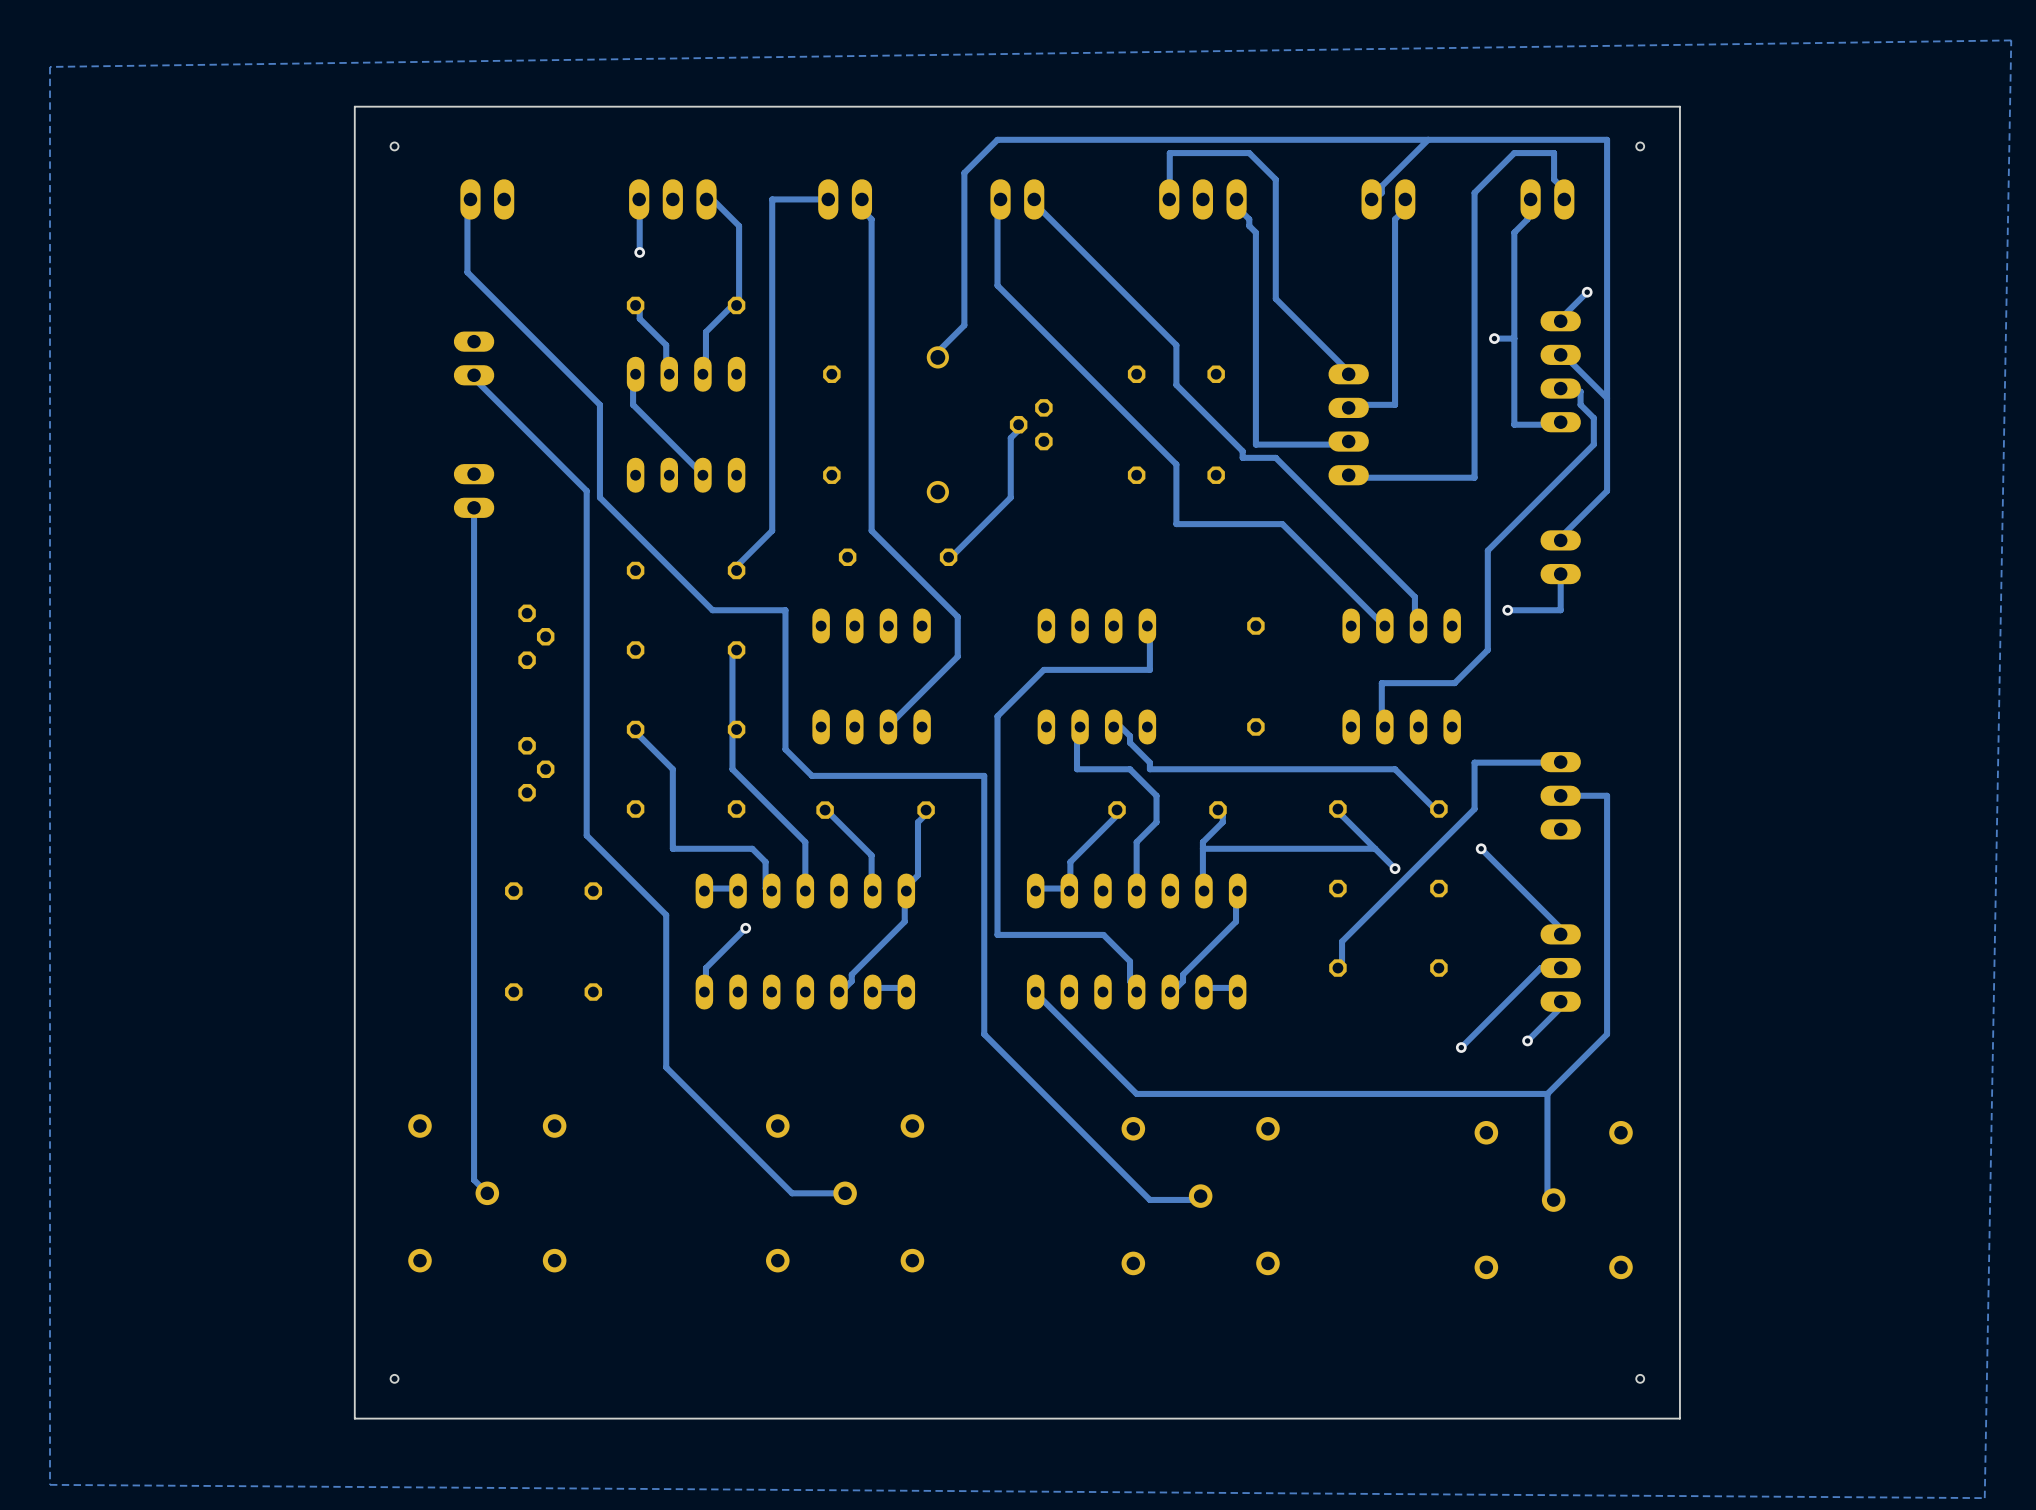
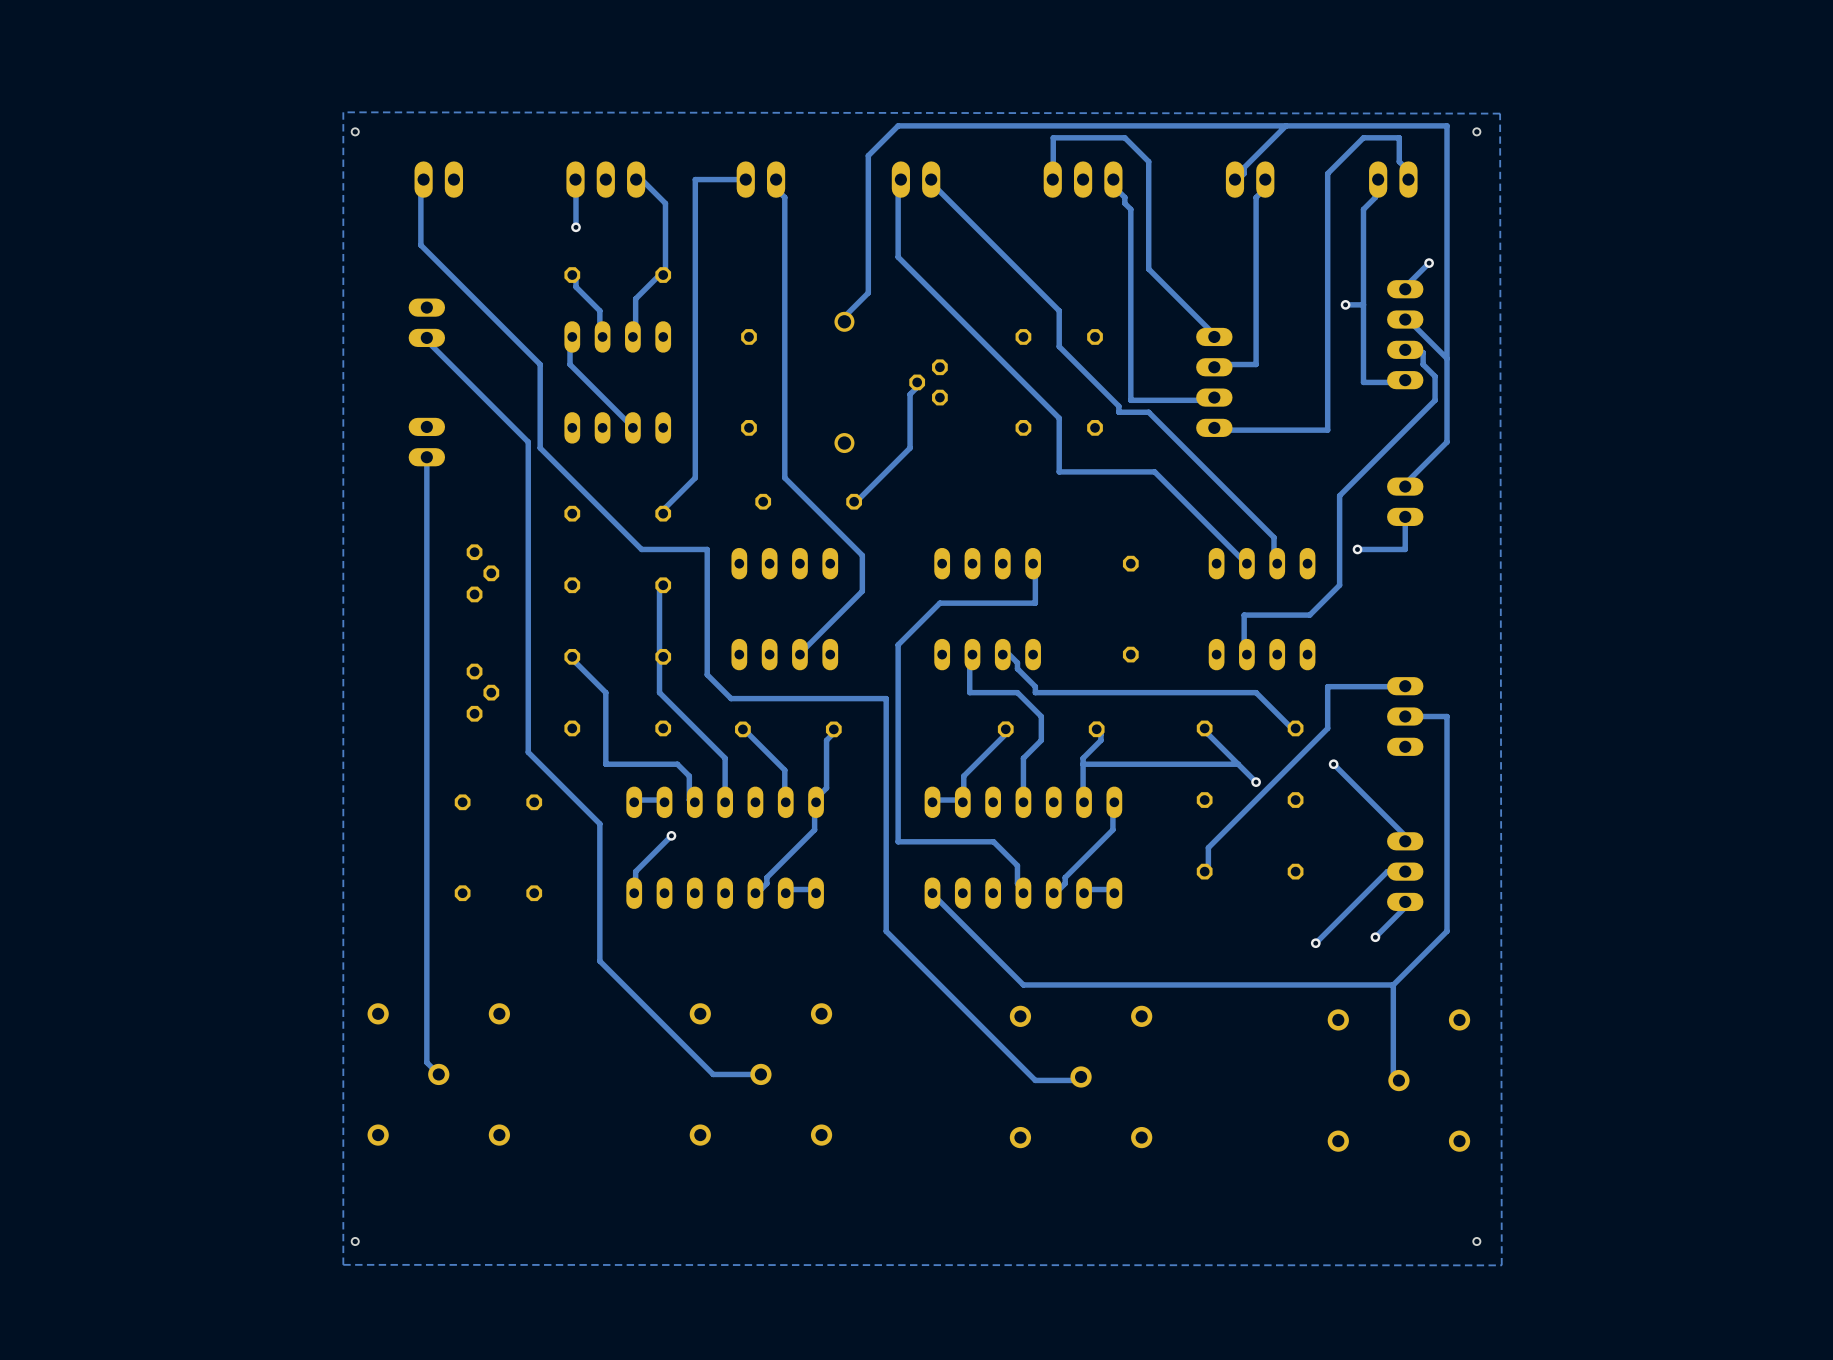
zone outline: (2011, 40) (50, 66) (50, 1484) (1984, 1498) (2011, 40) -> (343, 112) (1500, 113) (1501, 1265) (343, 1264) (343, 112)
board edge: (1679, 106) (354, 106) (354, 1418) (1679, 1418) (1679, 106) -> none

